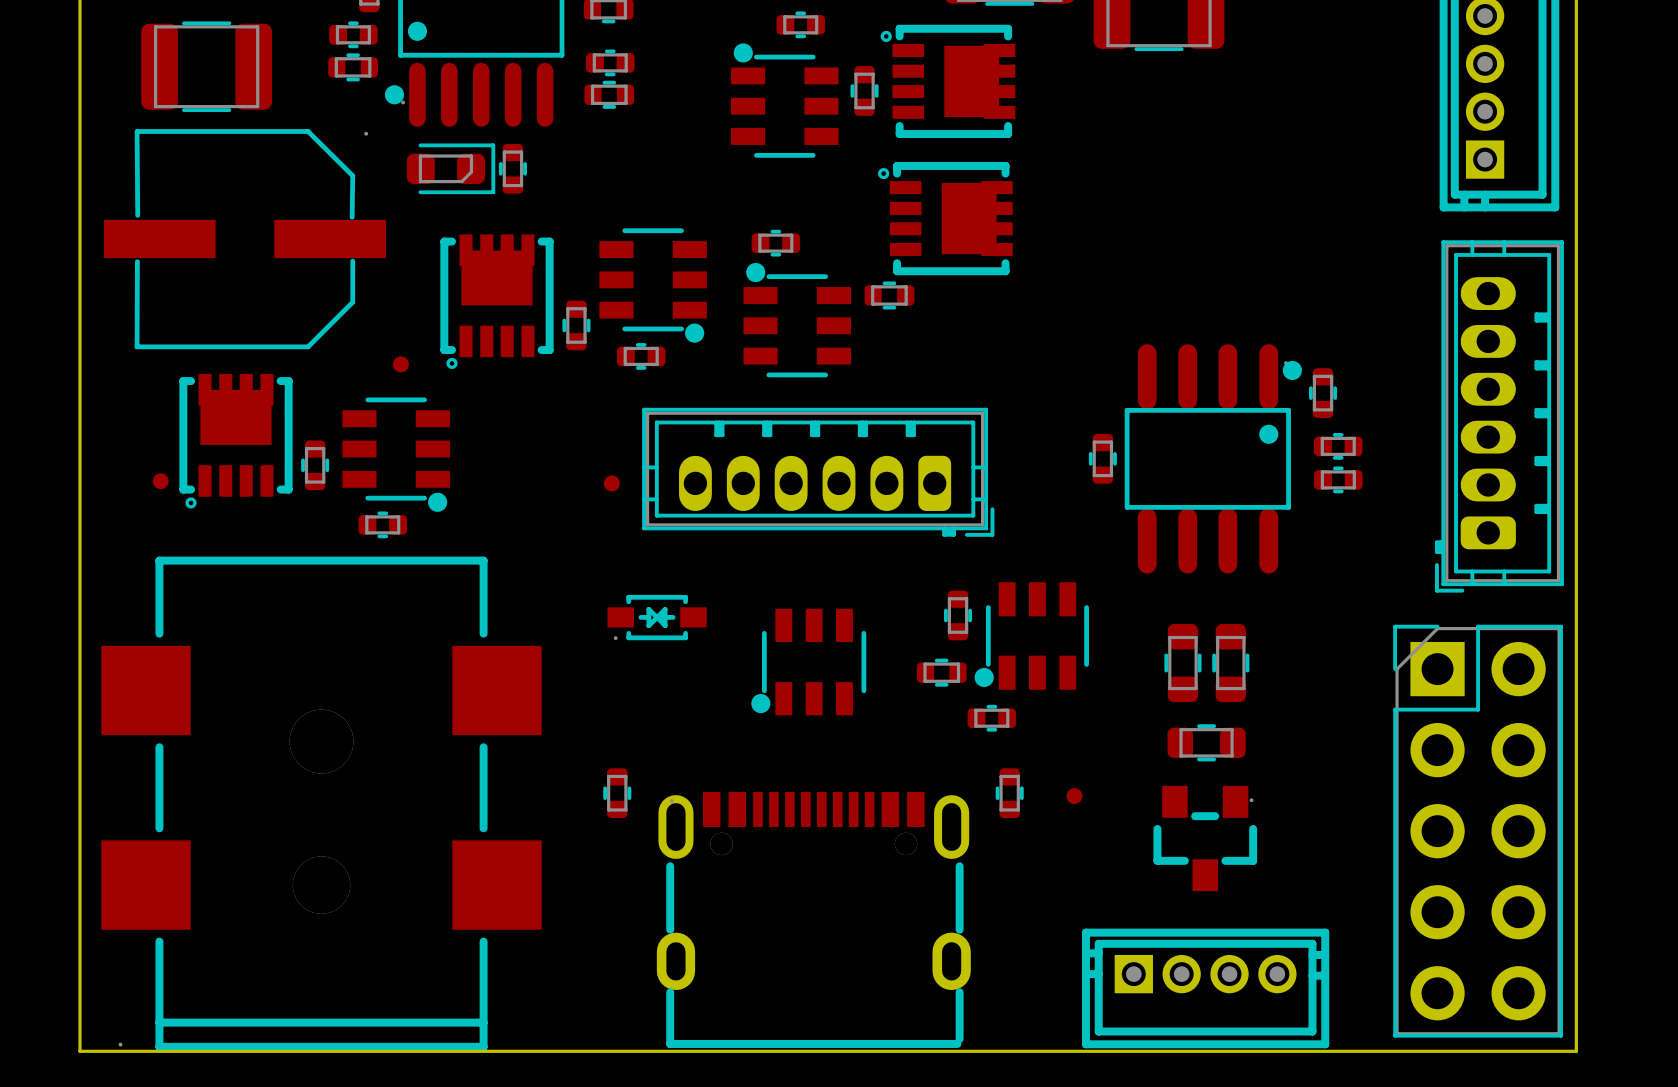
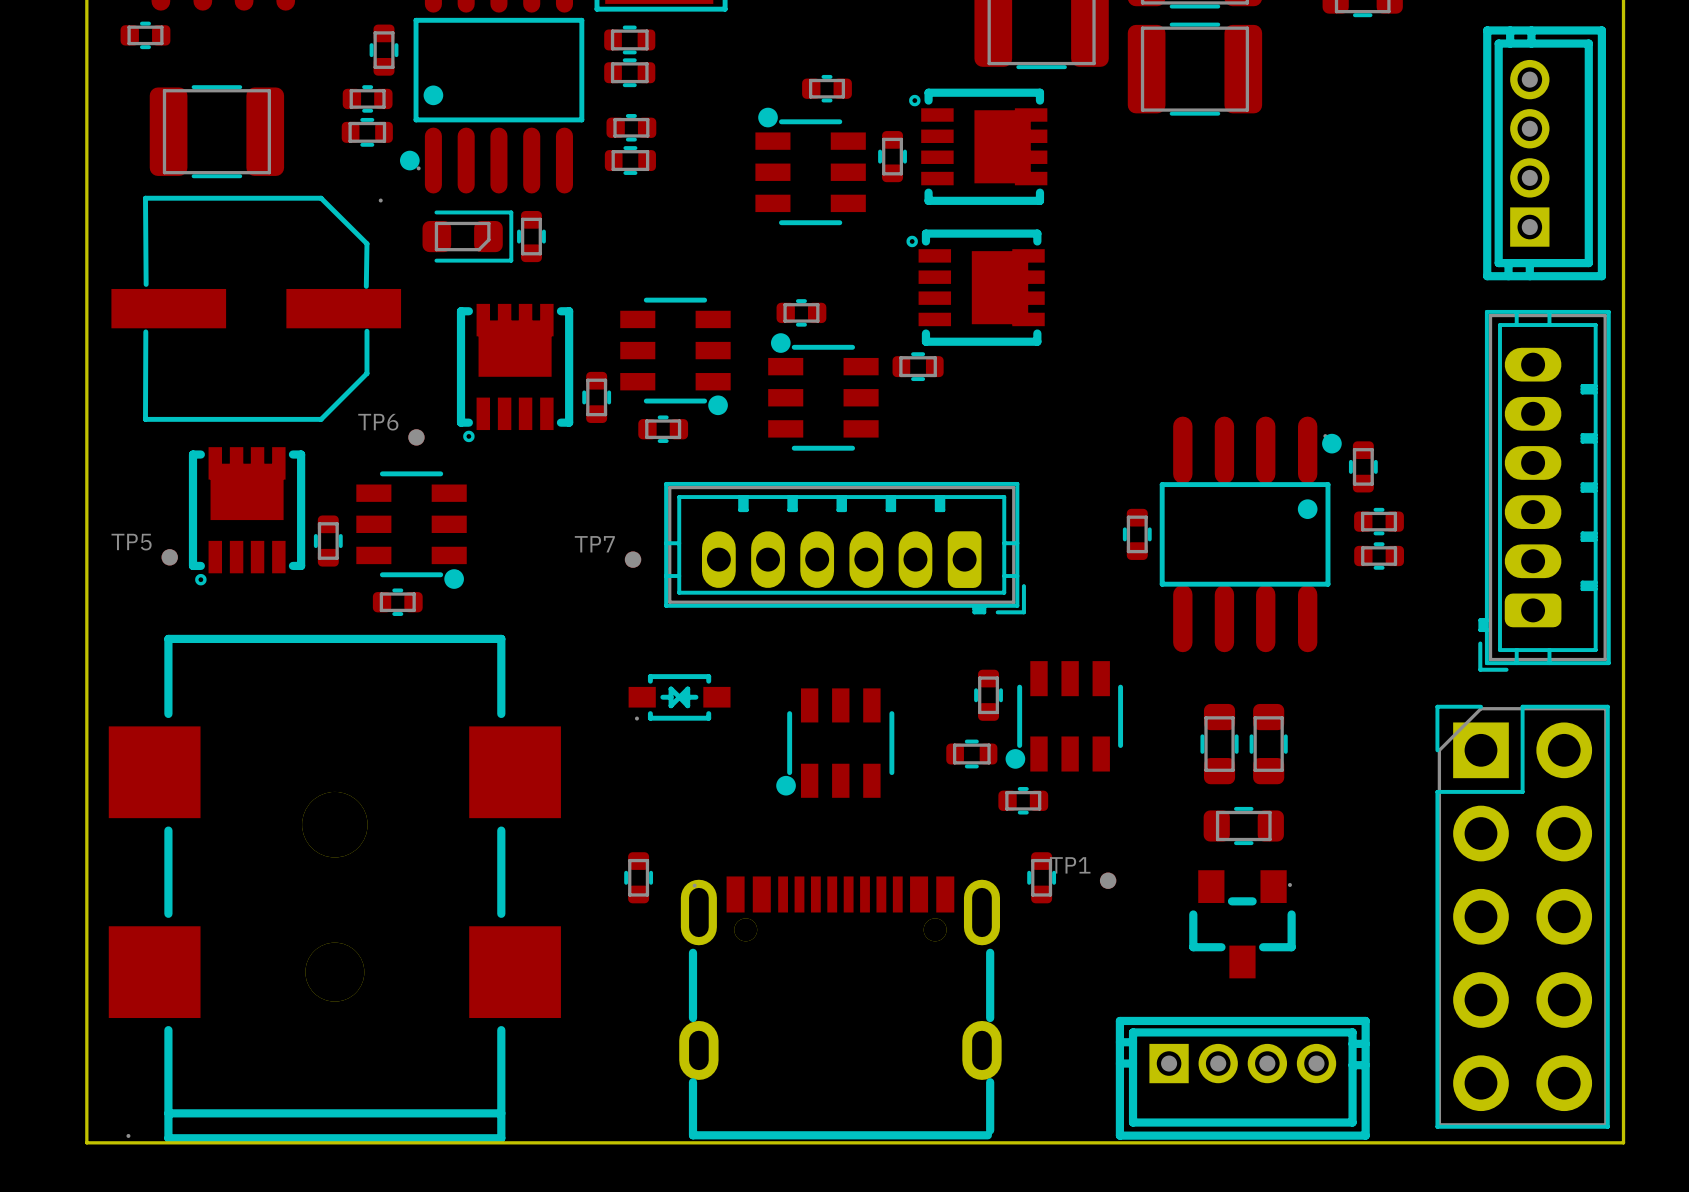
part: (400, 364) -> none
TP6: none -> (416, 437)
part: (160, 481) -> none
TP5: none -> (169, 557)
part: (611, 483) -> none
TP7: none -> (633, 559)
part: (1074, 796) -> none
TP1: none -> (1108, 880)

